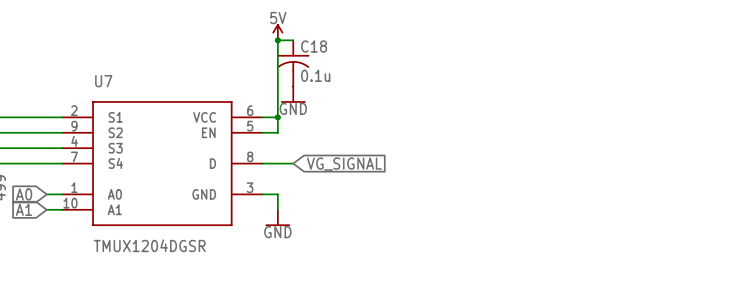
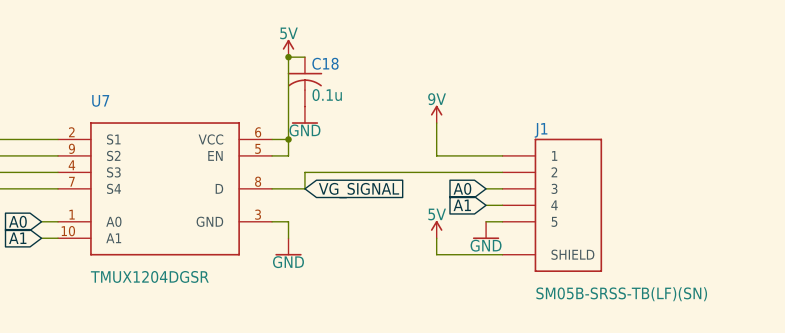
power symbol: none -> 9V (436, 114)
wire: none -> (436, 123) (436, 155) (502, 155)
wire: none -> (502, 172) (304, 172) (304, 188)
global label: none -> A0 (462, 188)
wire: none -> (486, 188) (502, 188)
global label: none -> A1 (462, 205)
wire: none -> (486, 205) (502, 205)
J1: none -> SM05B-SRSS-TB(LF)(SN) (552, 205)
wire: none -> (486, 221) (502, 221)
power symbol: none -> 5V (436, 229)
power symbol: none -> GND (486, 230)
wire: none -> (436, 238) (436, 254) (502, 254)

